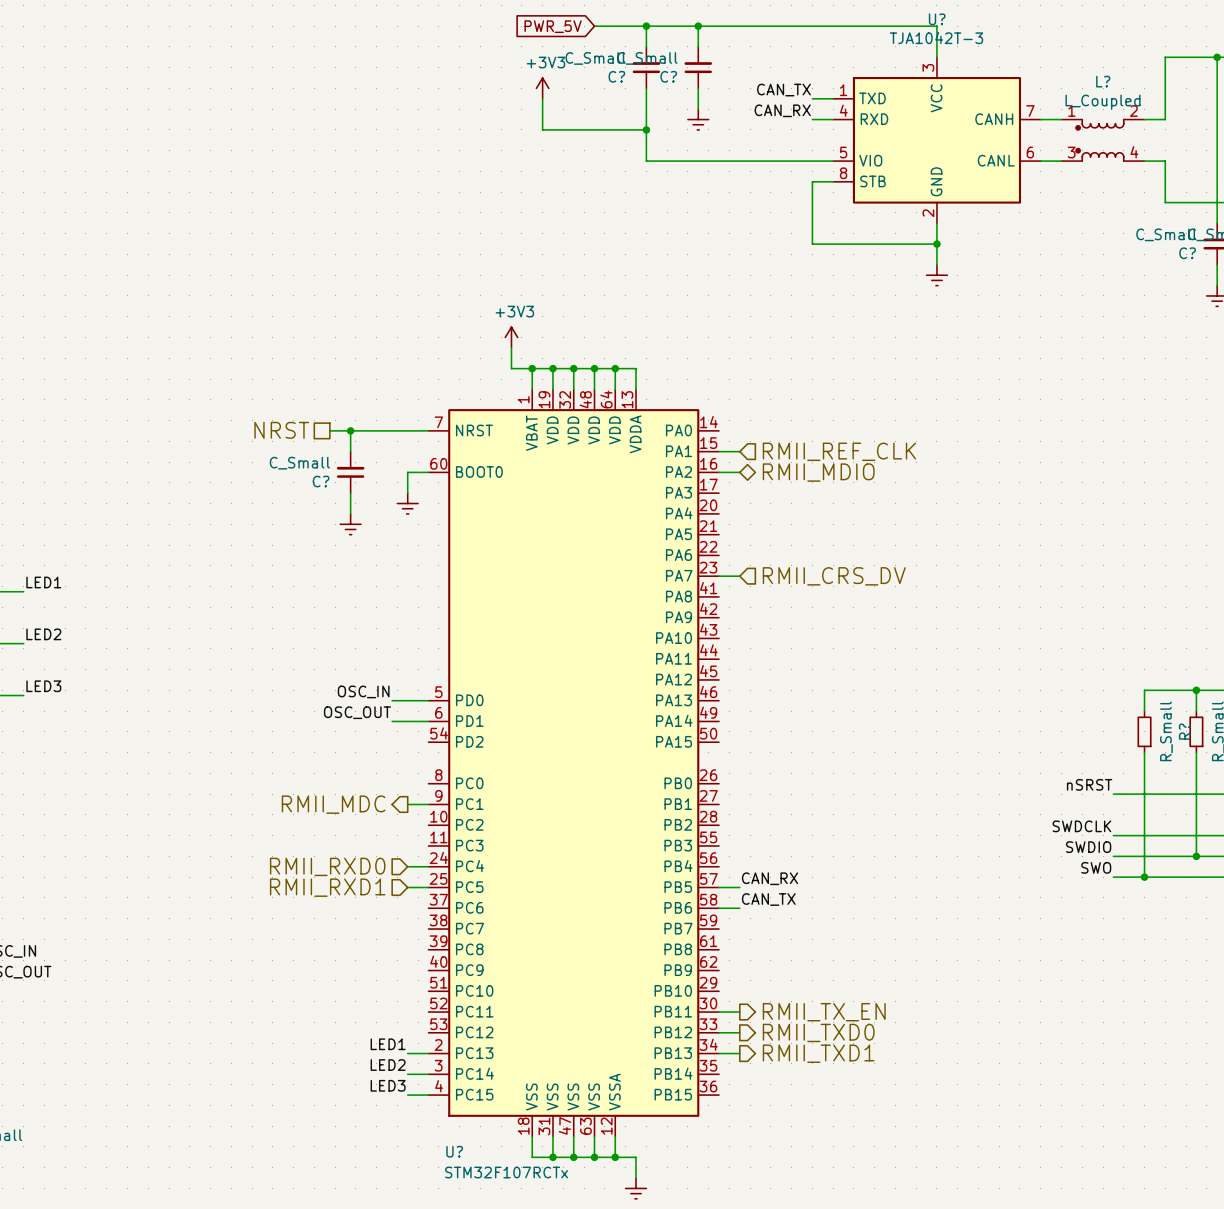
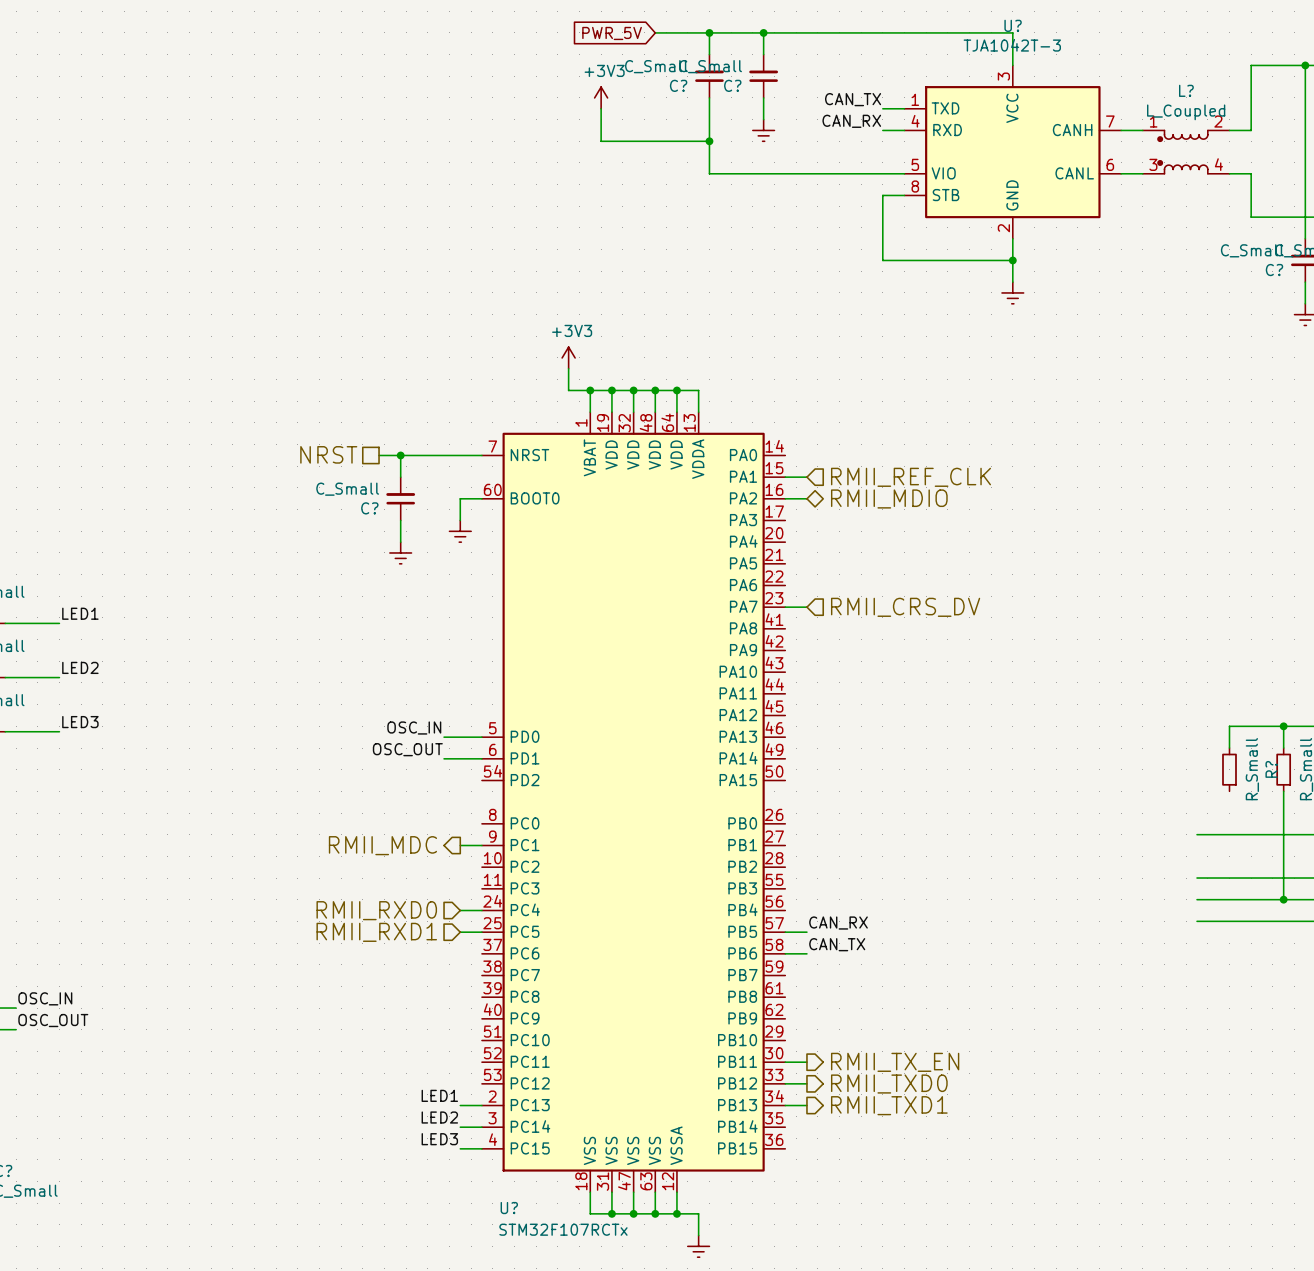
wire: (1144, 752) (1144, 877) -> none
label: nSRST (1089, 784) -> none
label: SWDCLK (1081, 826) -> none
label: SWDIO (1088, 847) -> none
label: SWO (1096, 867) -> none
junction: (1144, 877) -> none

